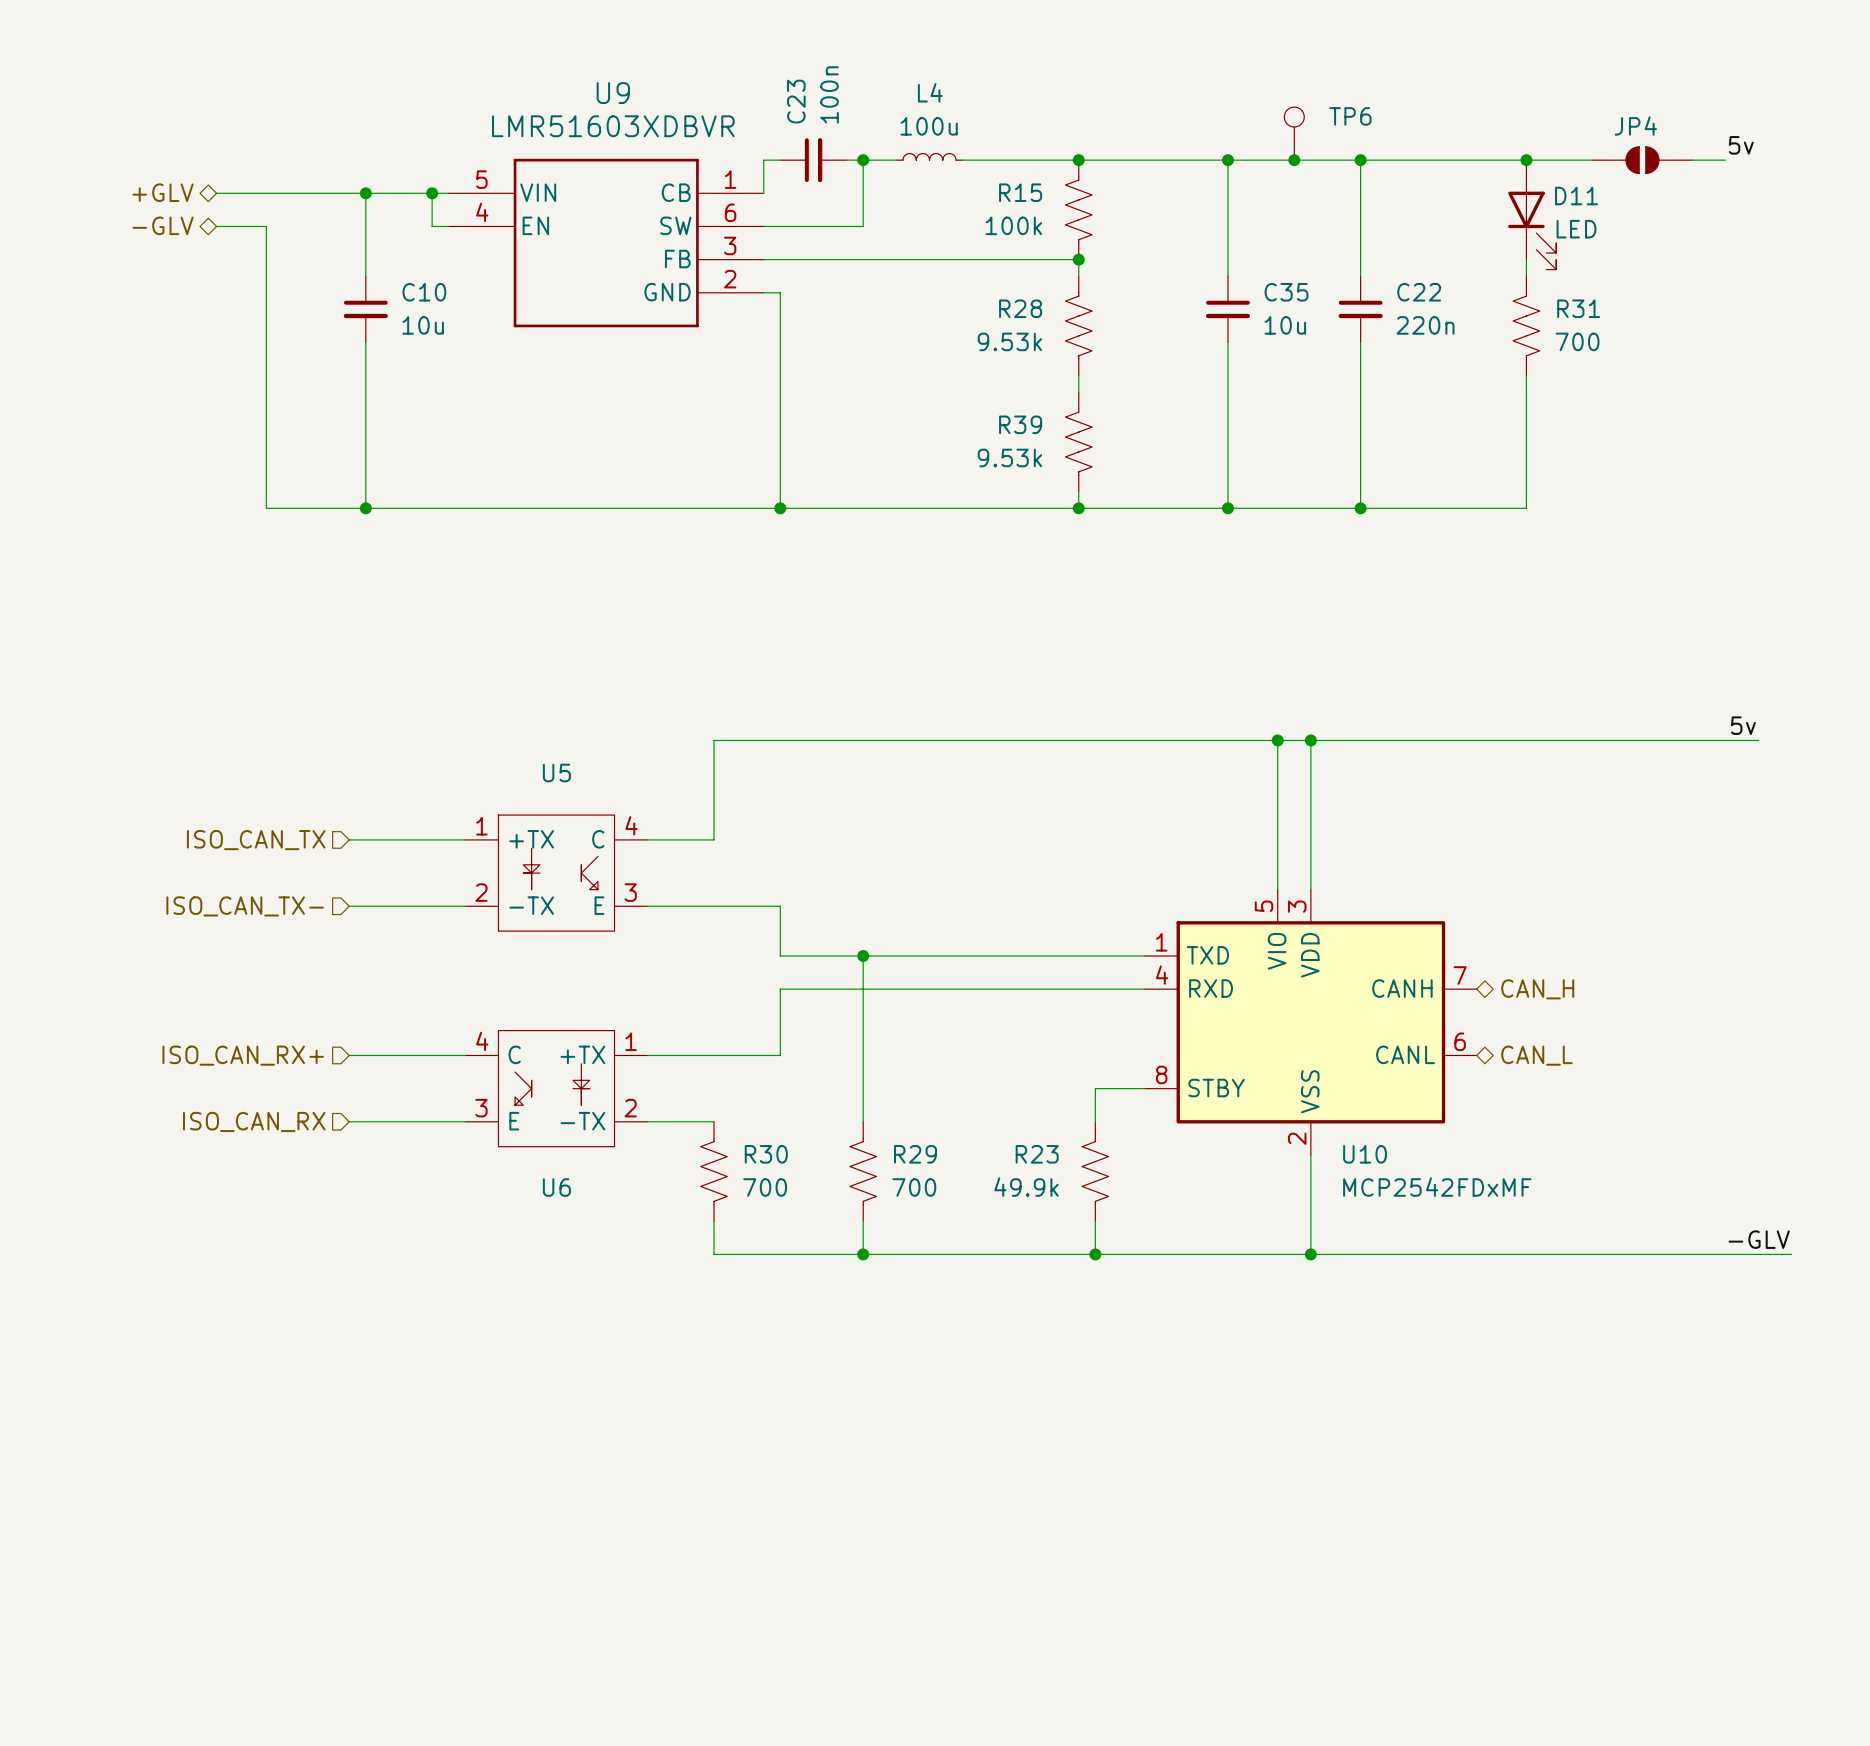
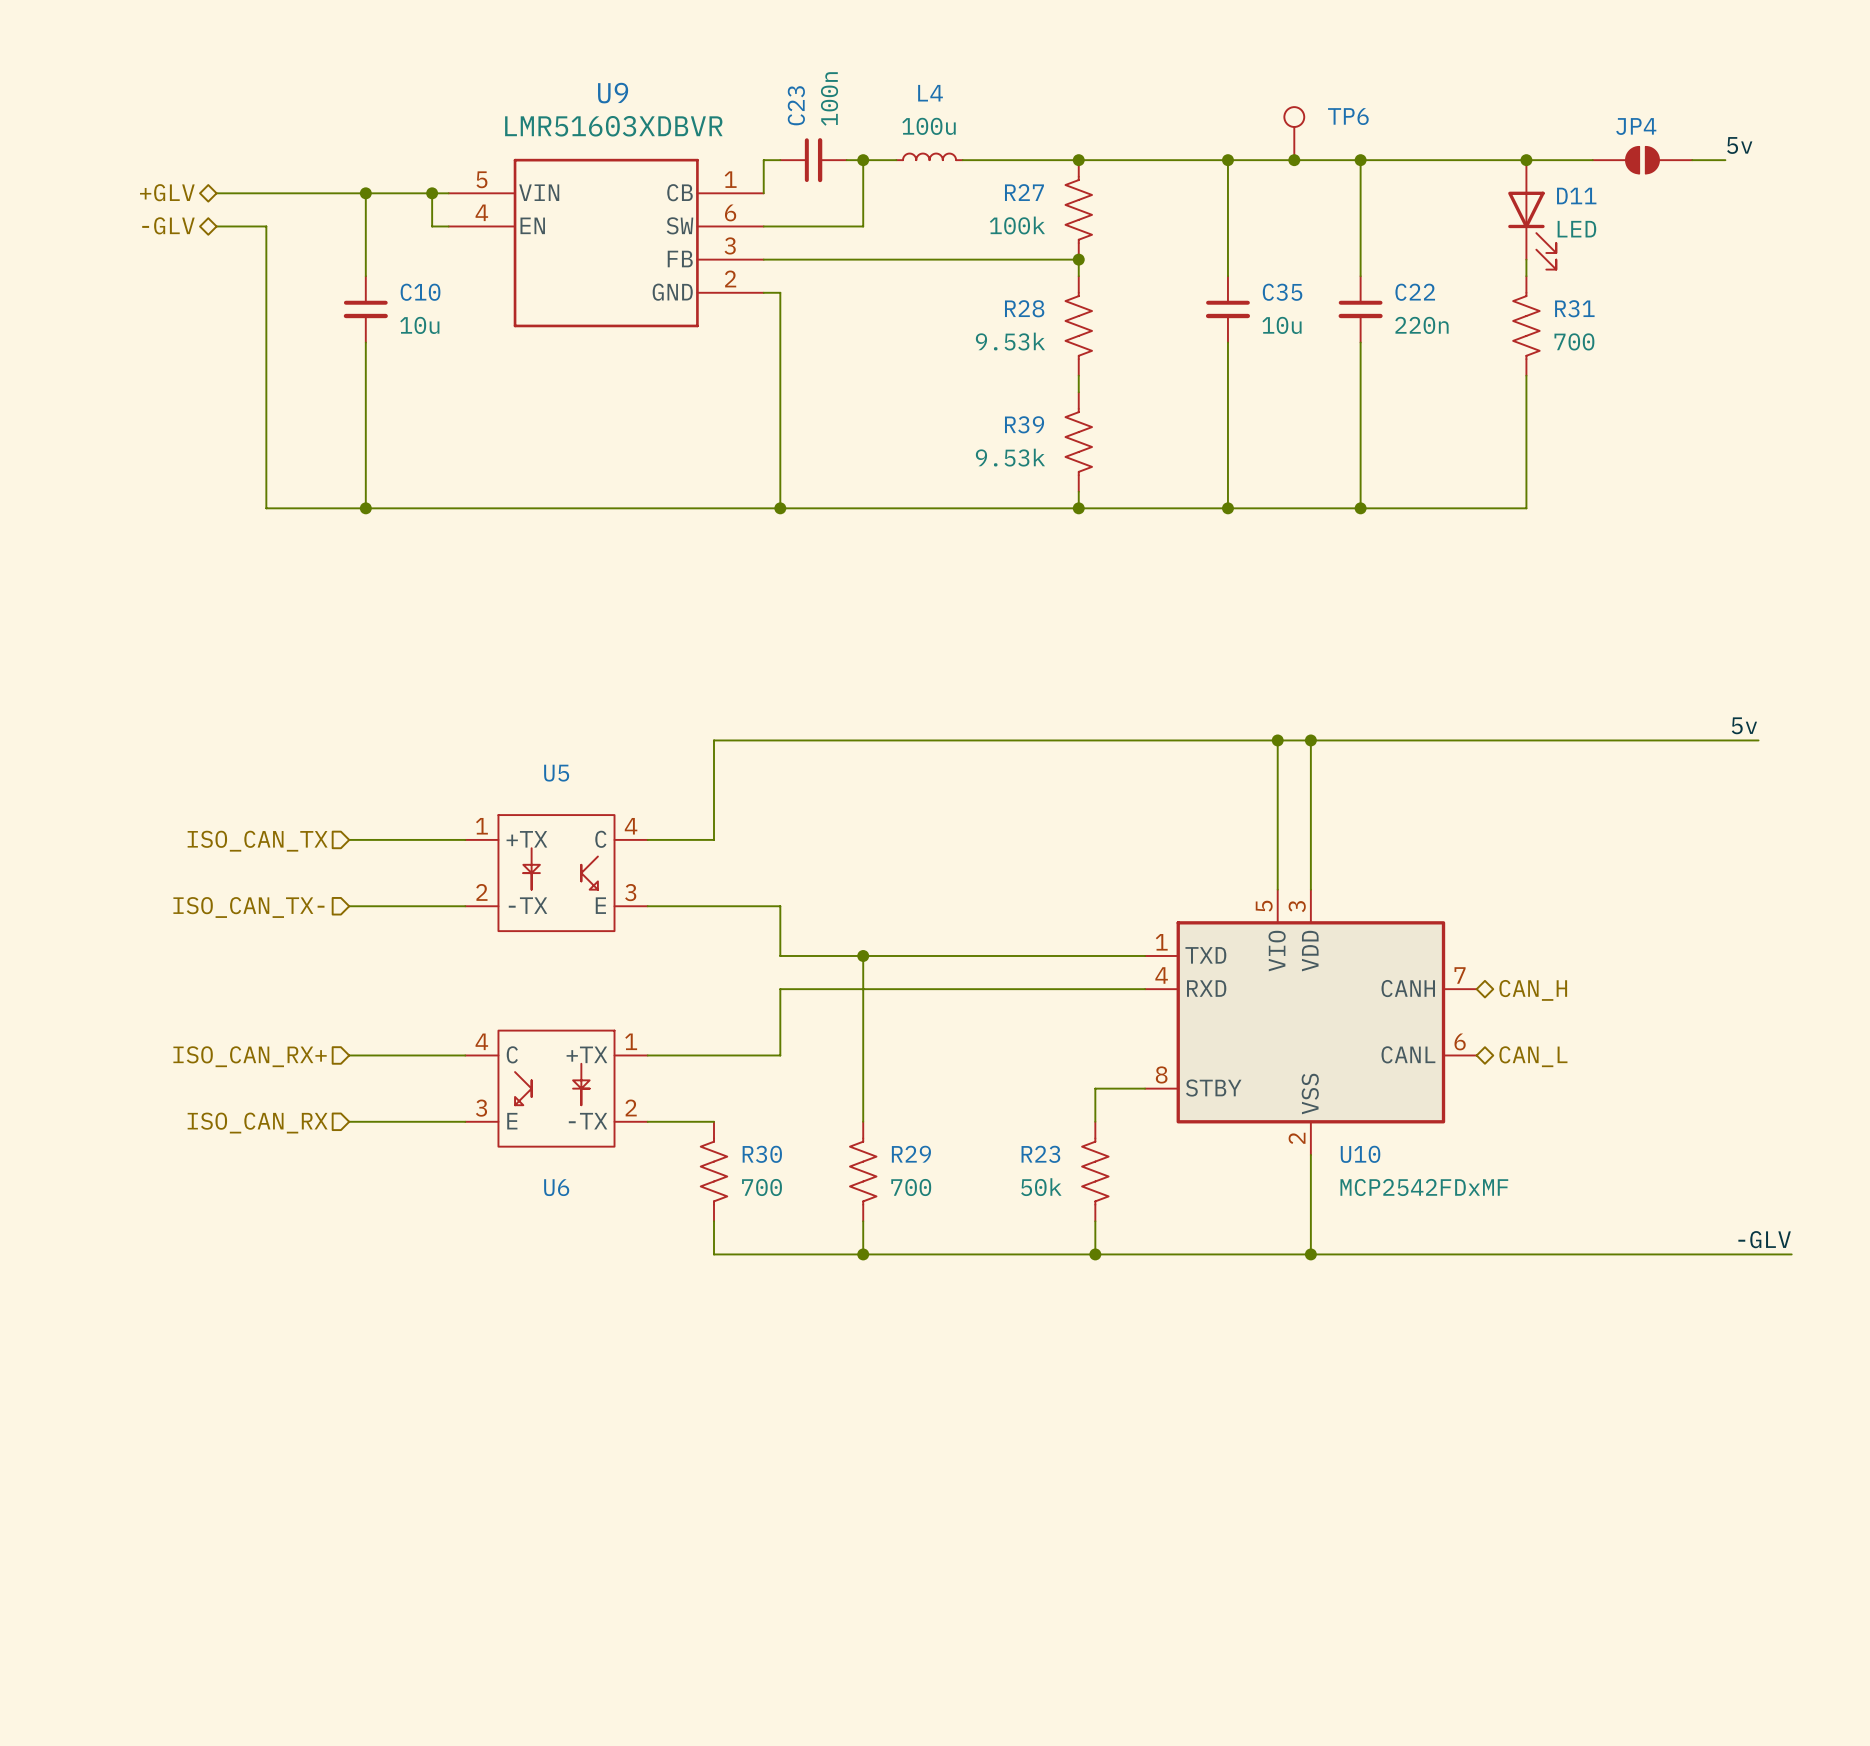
R15 name: R15 (1020, 192) -> R27 (1024, 192)
R23 value: 49.9k (1026, 1187) -> 50k (1041, 1187)

